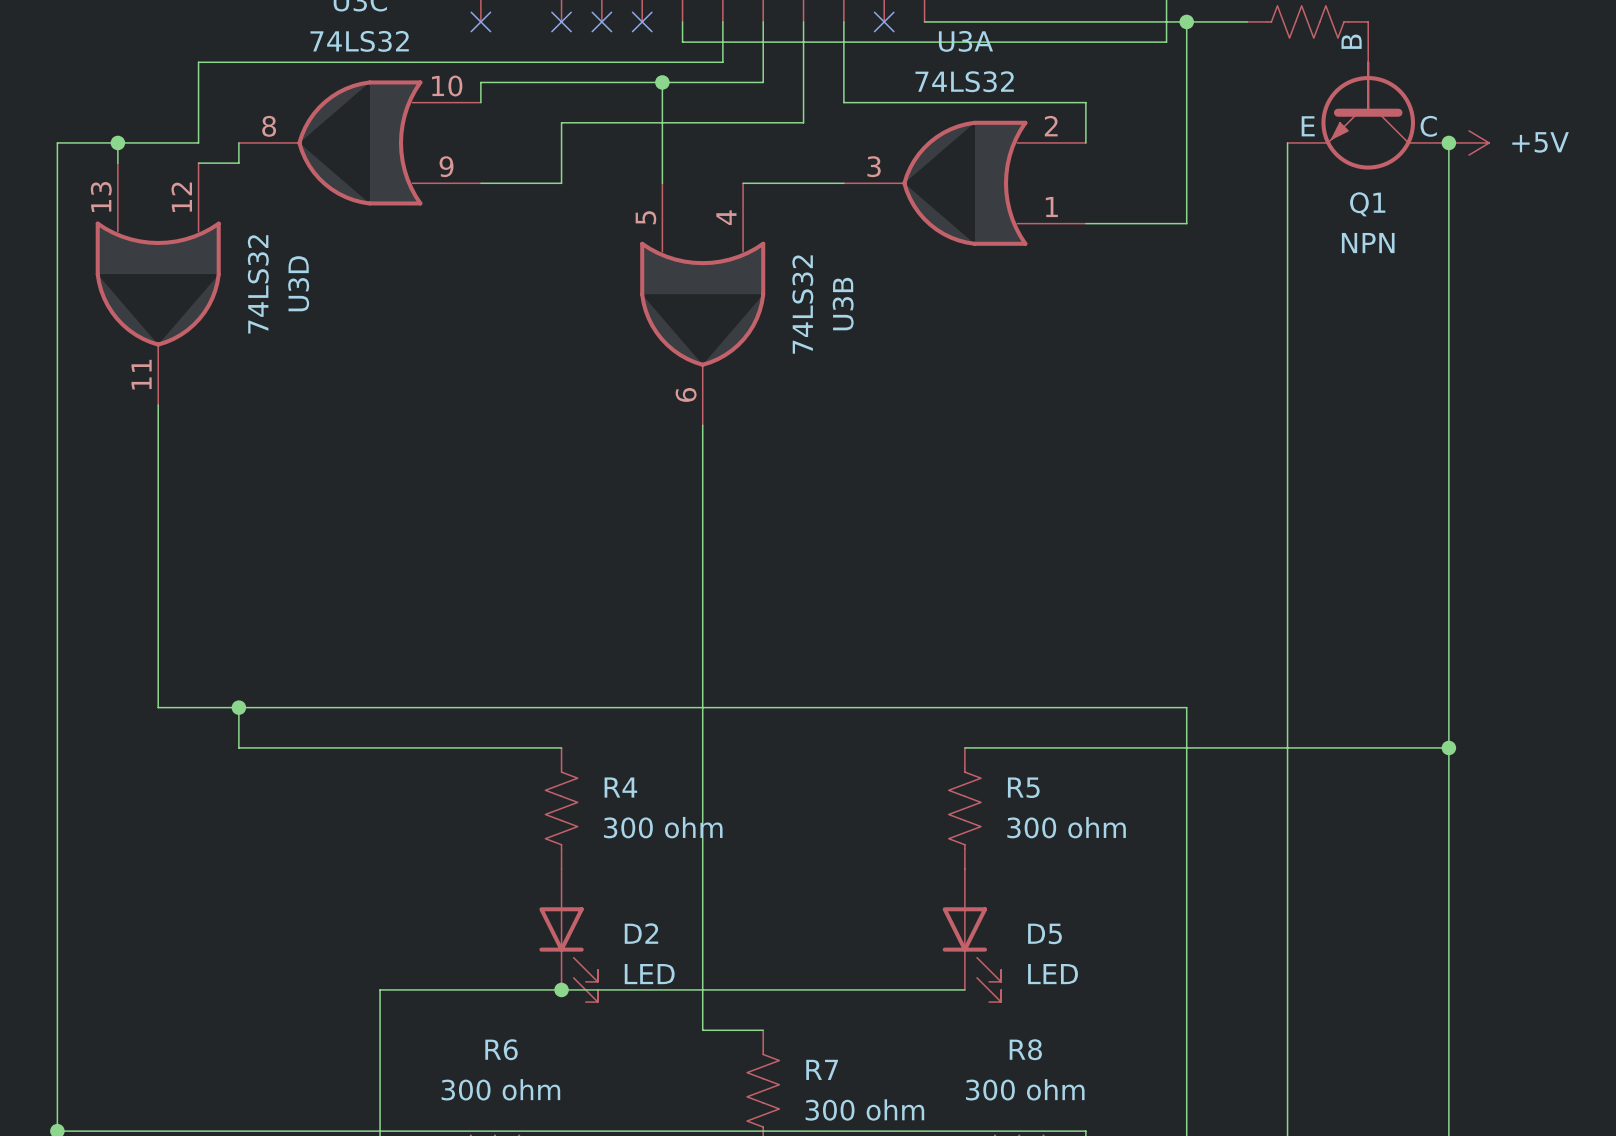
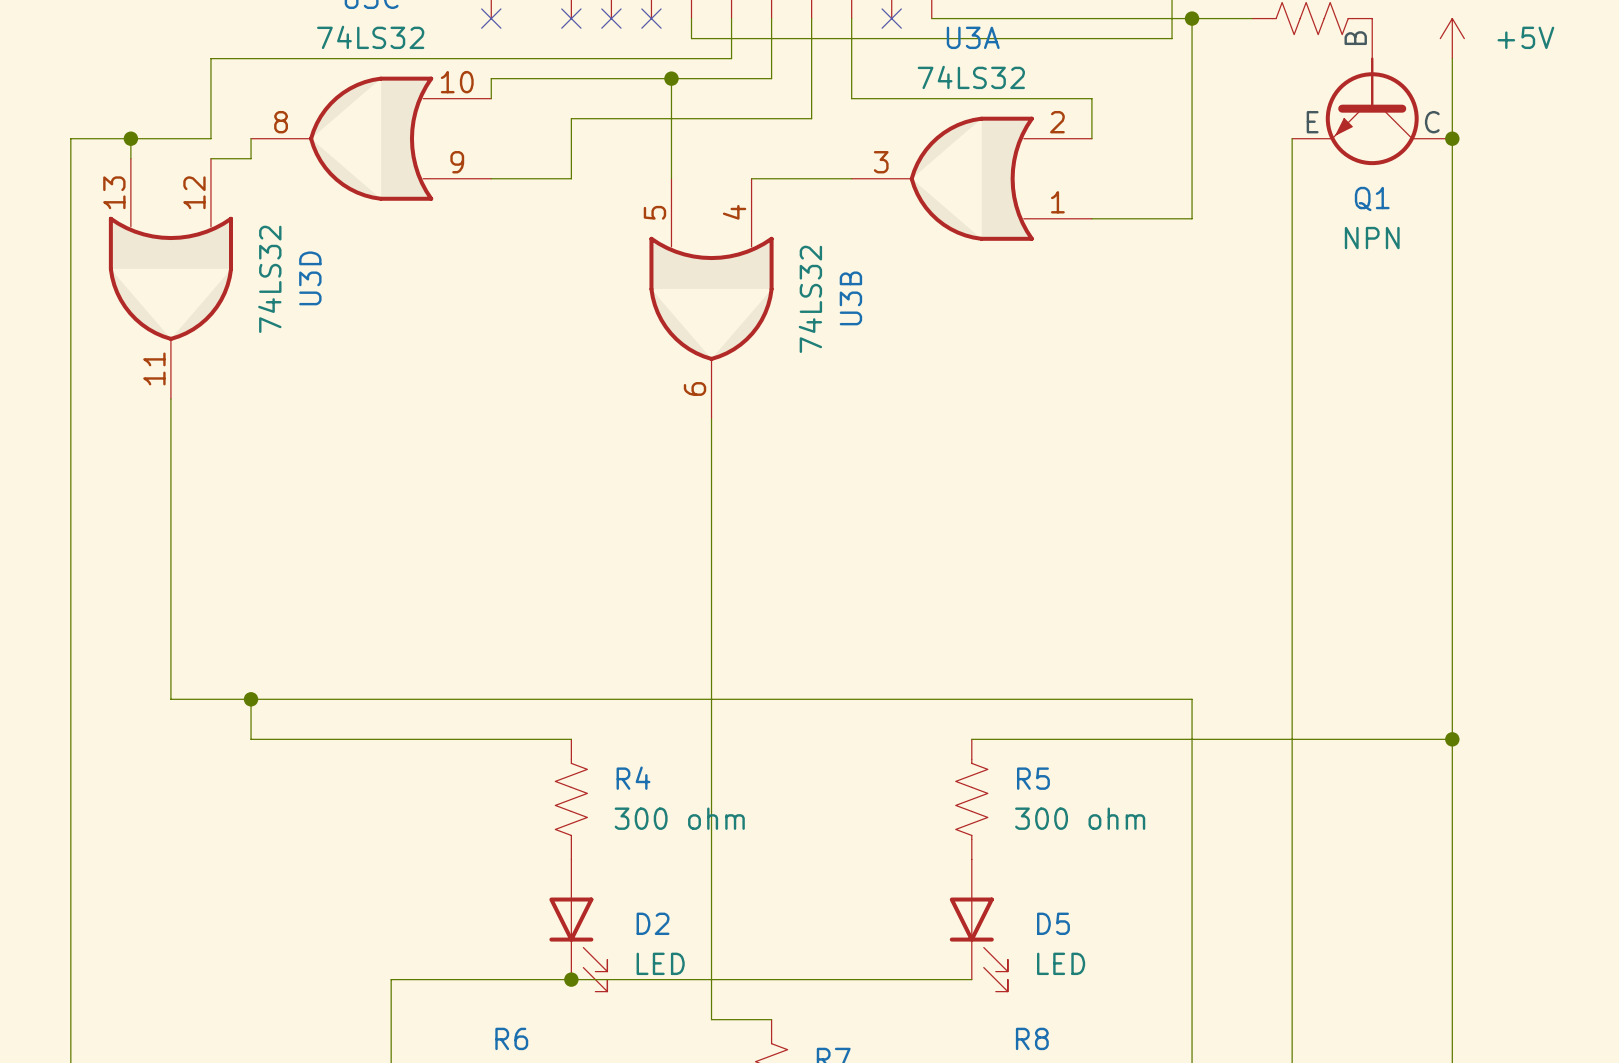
wire: none -> (1452, 58) (1452, 138)
power symbol rotation: 0° (1469, 142) -> 90° counterclockwise (1452, 38)
power symbol position: +5V (1469, 142) -> +5V (1452, 38)

